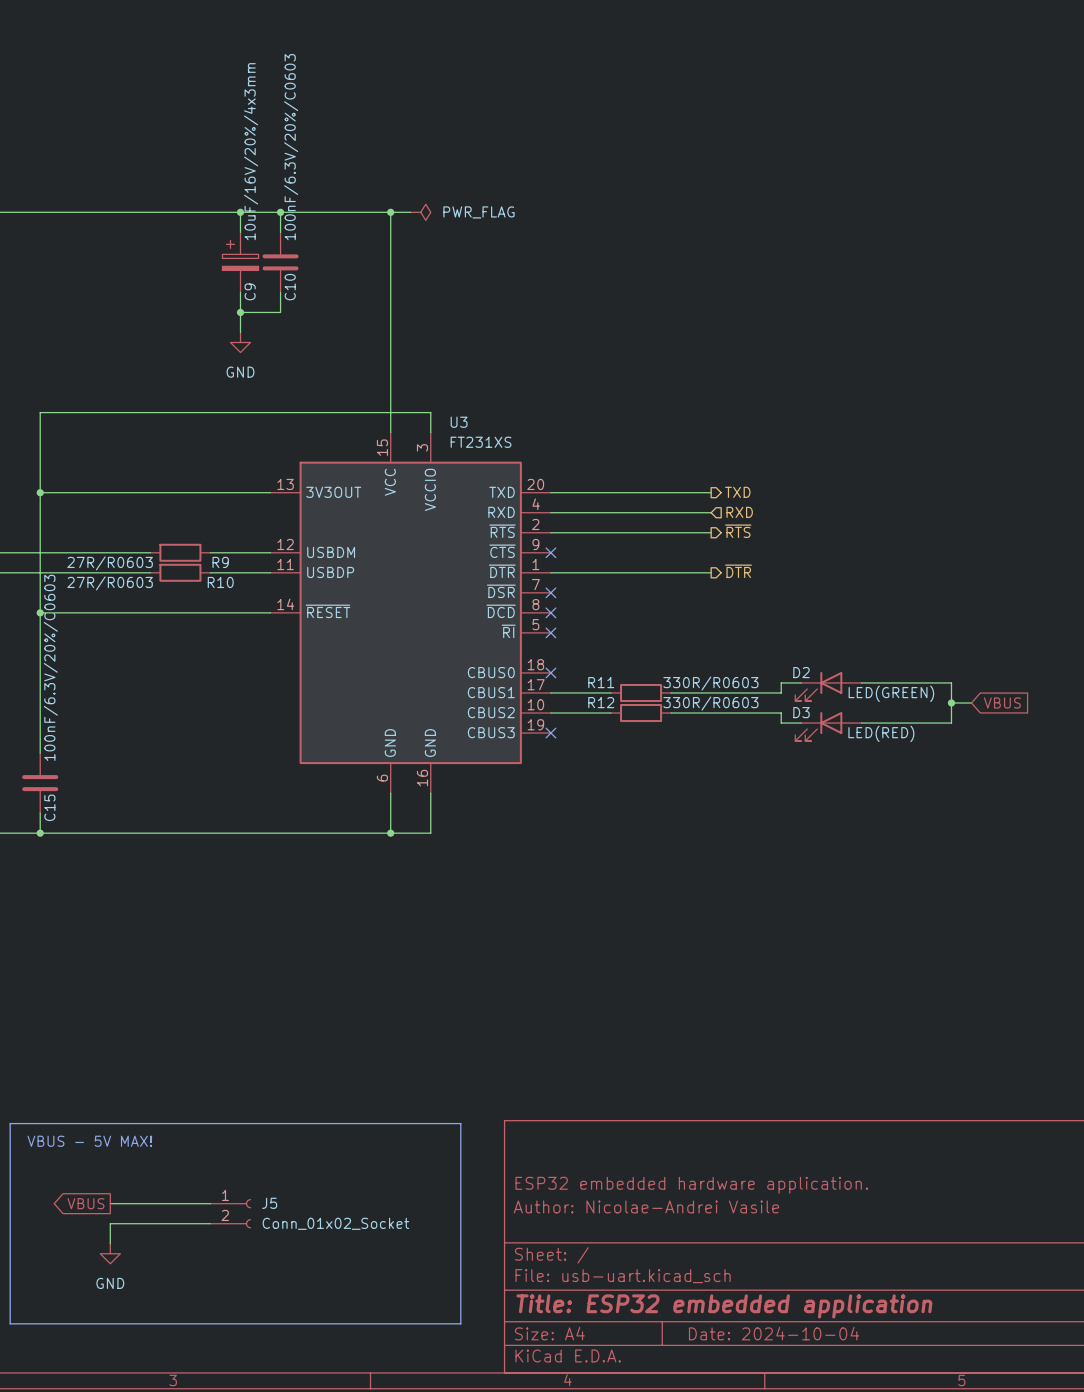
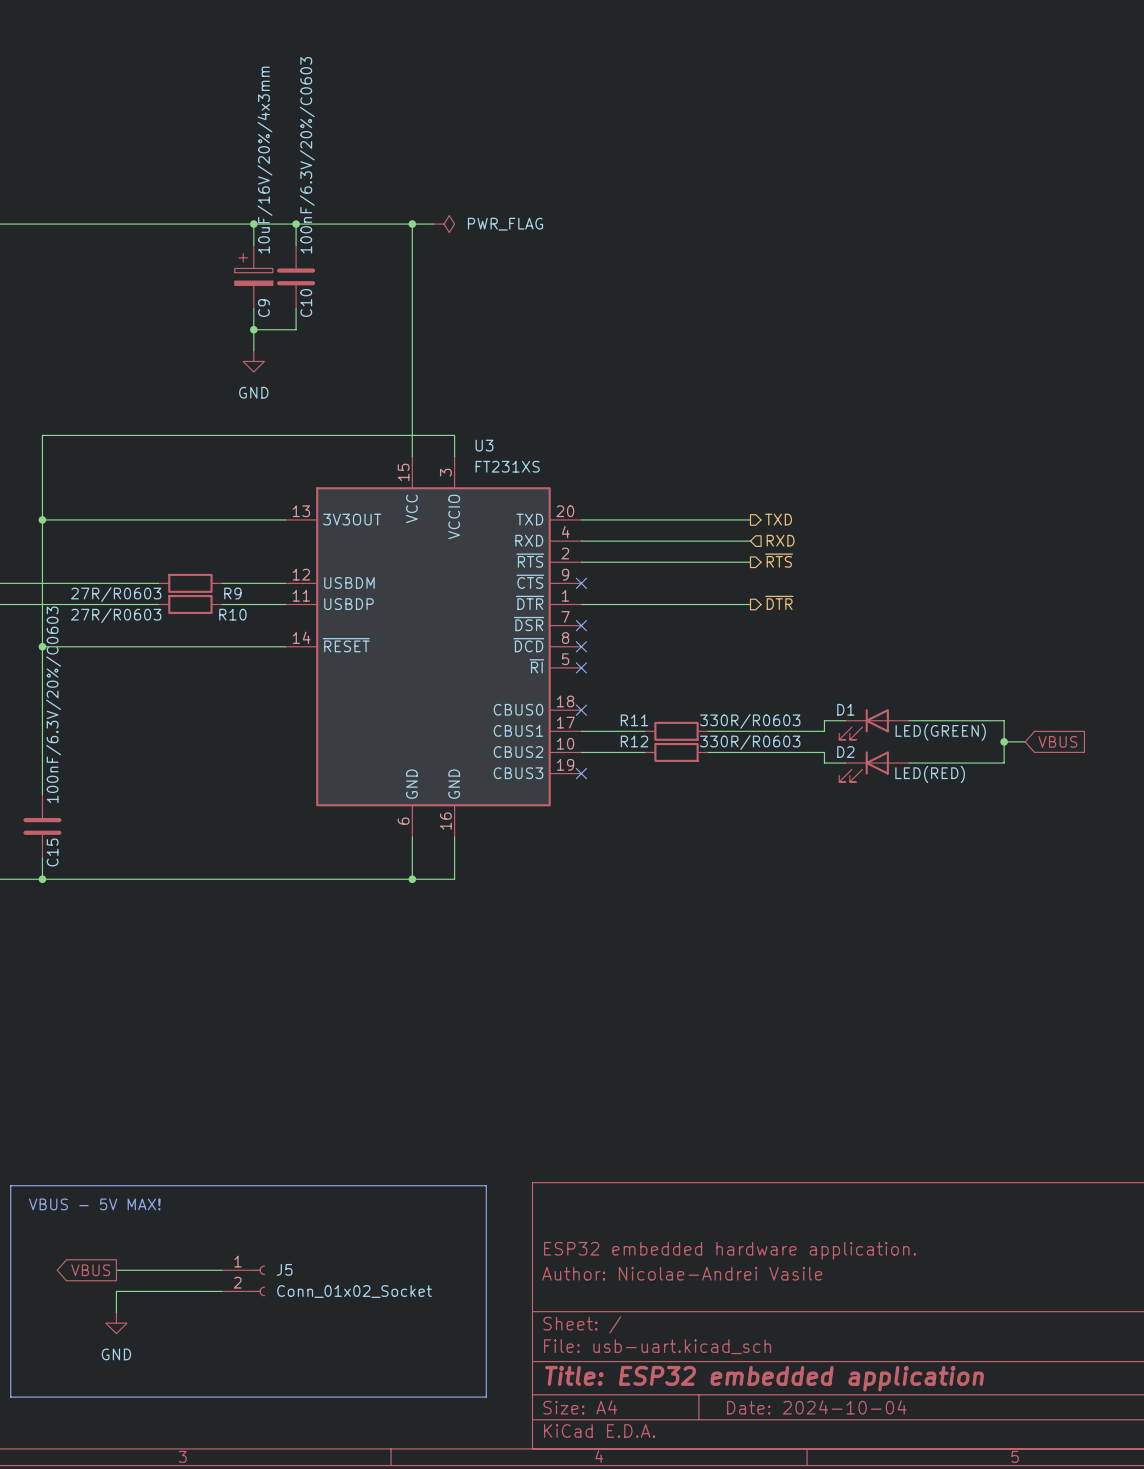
D2 name: D2 (801, 672) -> D1 (845, 709)
D3 name: D3 (801, 712) -> D2 (845, 752)

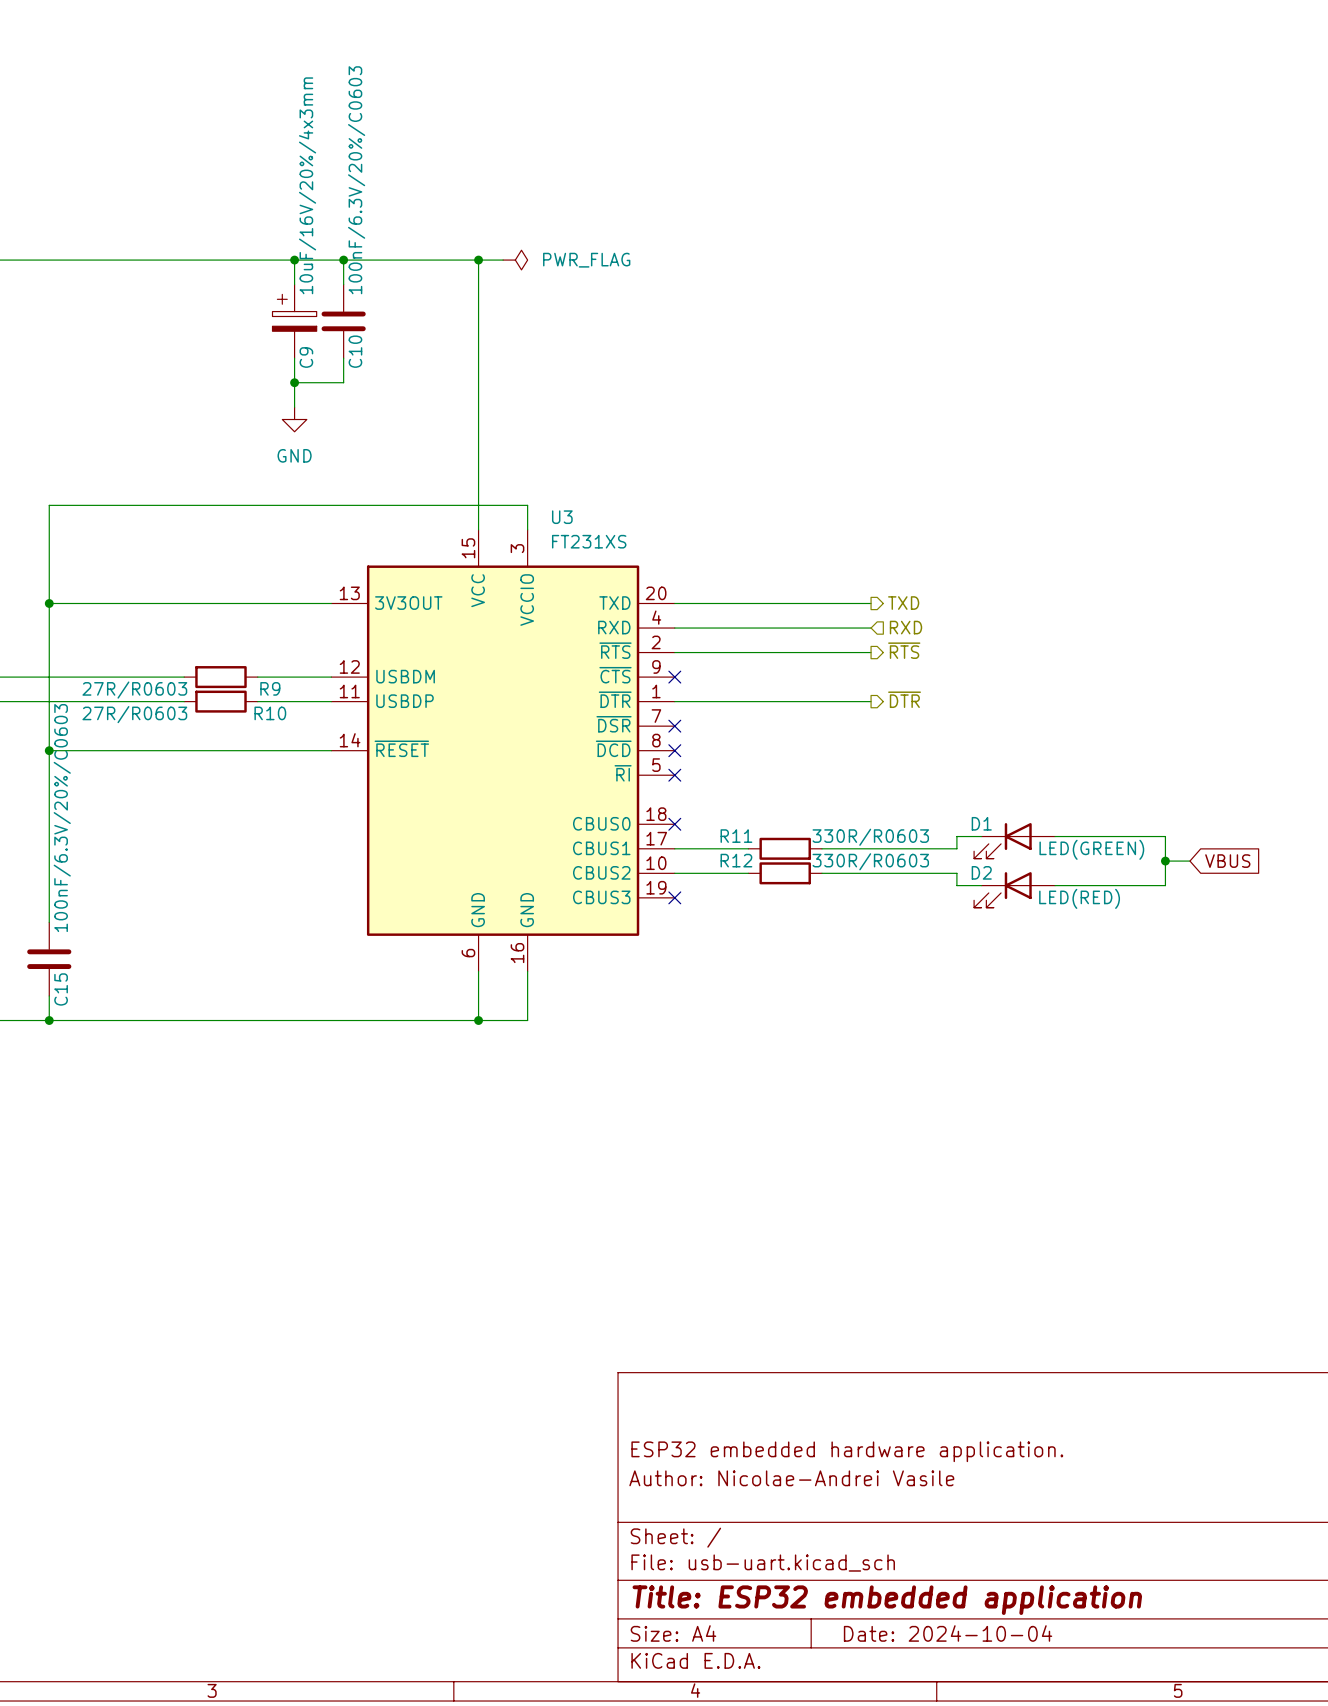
line: (10, 1185) (486, 1185) (486, 1397) (10, 1397) (10, 1185) -> none
text: VBUS - 5V MAX! (94, 1204) -> none
global label: VBUS (90, 1270) -> none
wire: (116, 1270) (222, 1270) -> none
J5: Conn_01x02_Socket (243, 1280) -> none
wire: (222, 1291) (116, 1291) (116, 1312) -> none
power symbol: GND (116, 1323) -> none

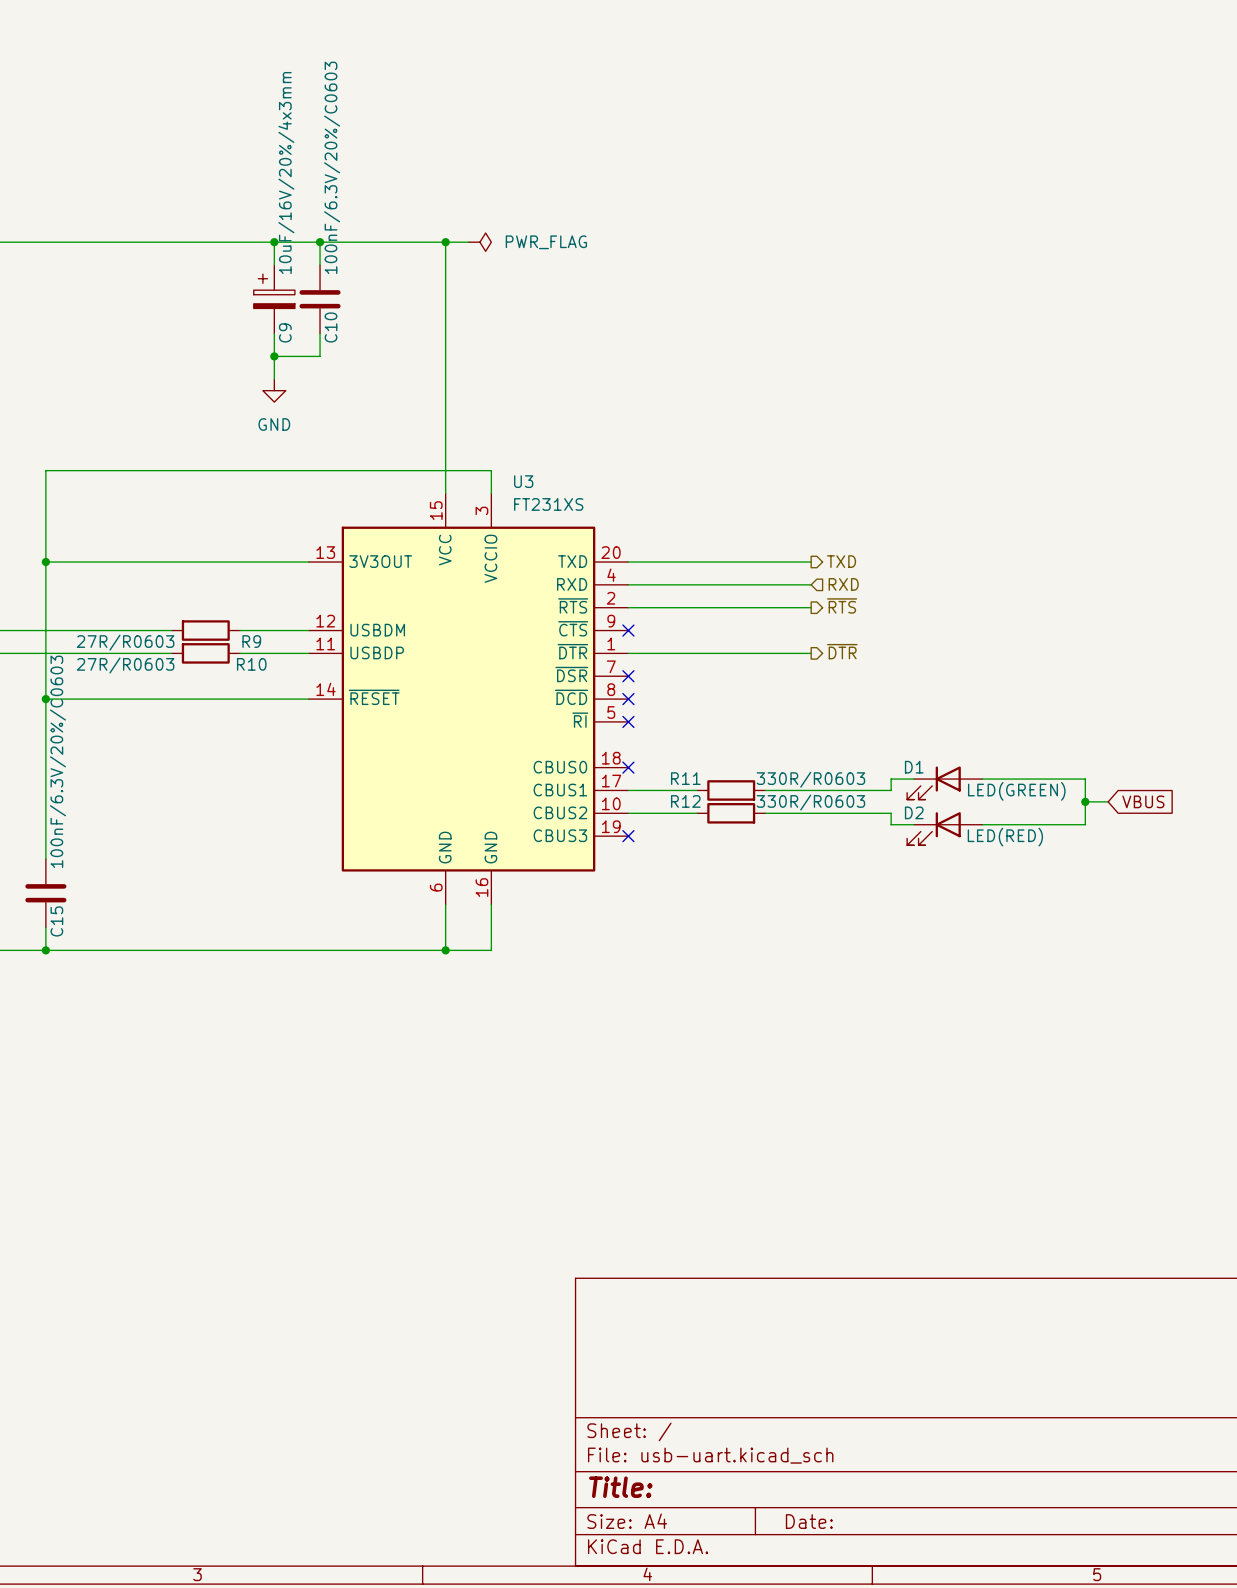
title block: ESP32 embedded hardware application. (847, 1451) -> none
title block: Author: Nicolae-Andrei Vasile (791, 1478) -> none
title block: Title: ESP32 embedded application (887, 1600) -> Title: (620, 1487)
title block: Date: 2024-10-04 (948, 1633) -> Date: (809, 1521)

